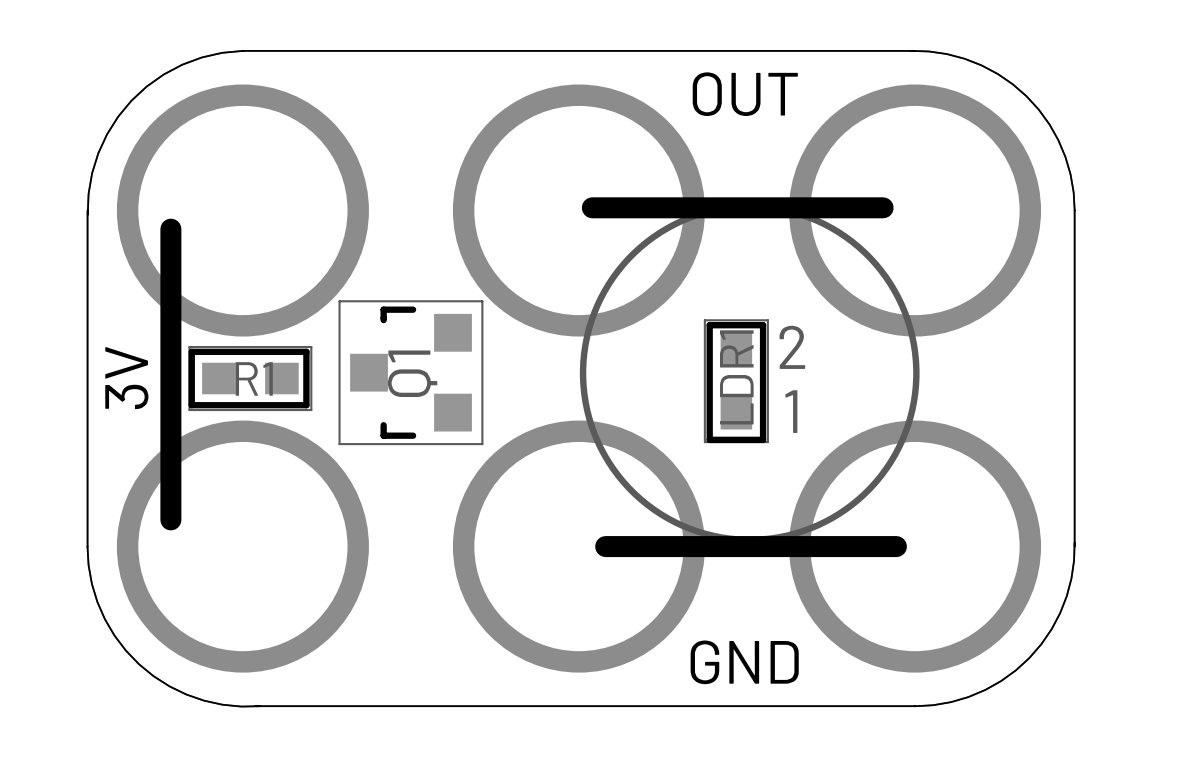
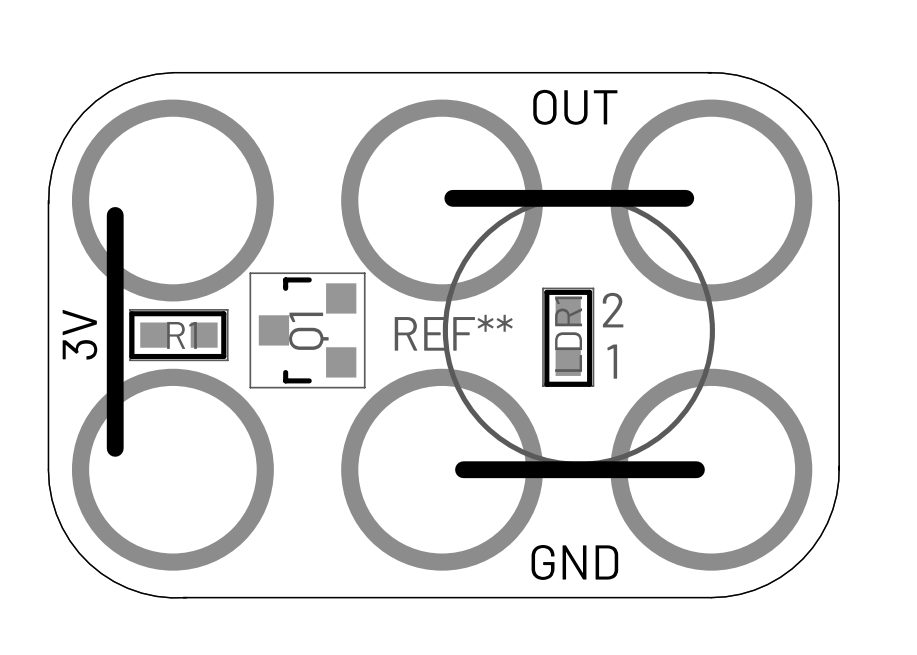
REF** name: none -> REF** (453, 332)

